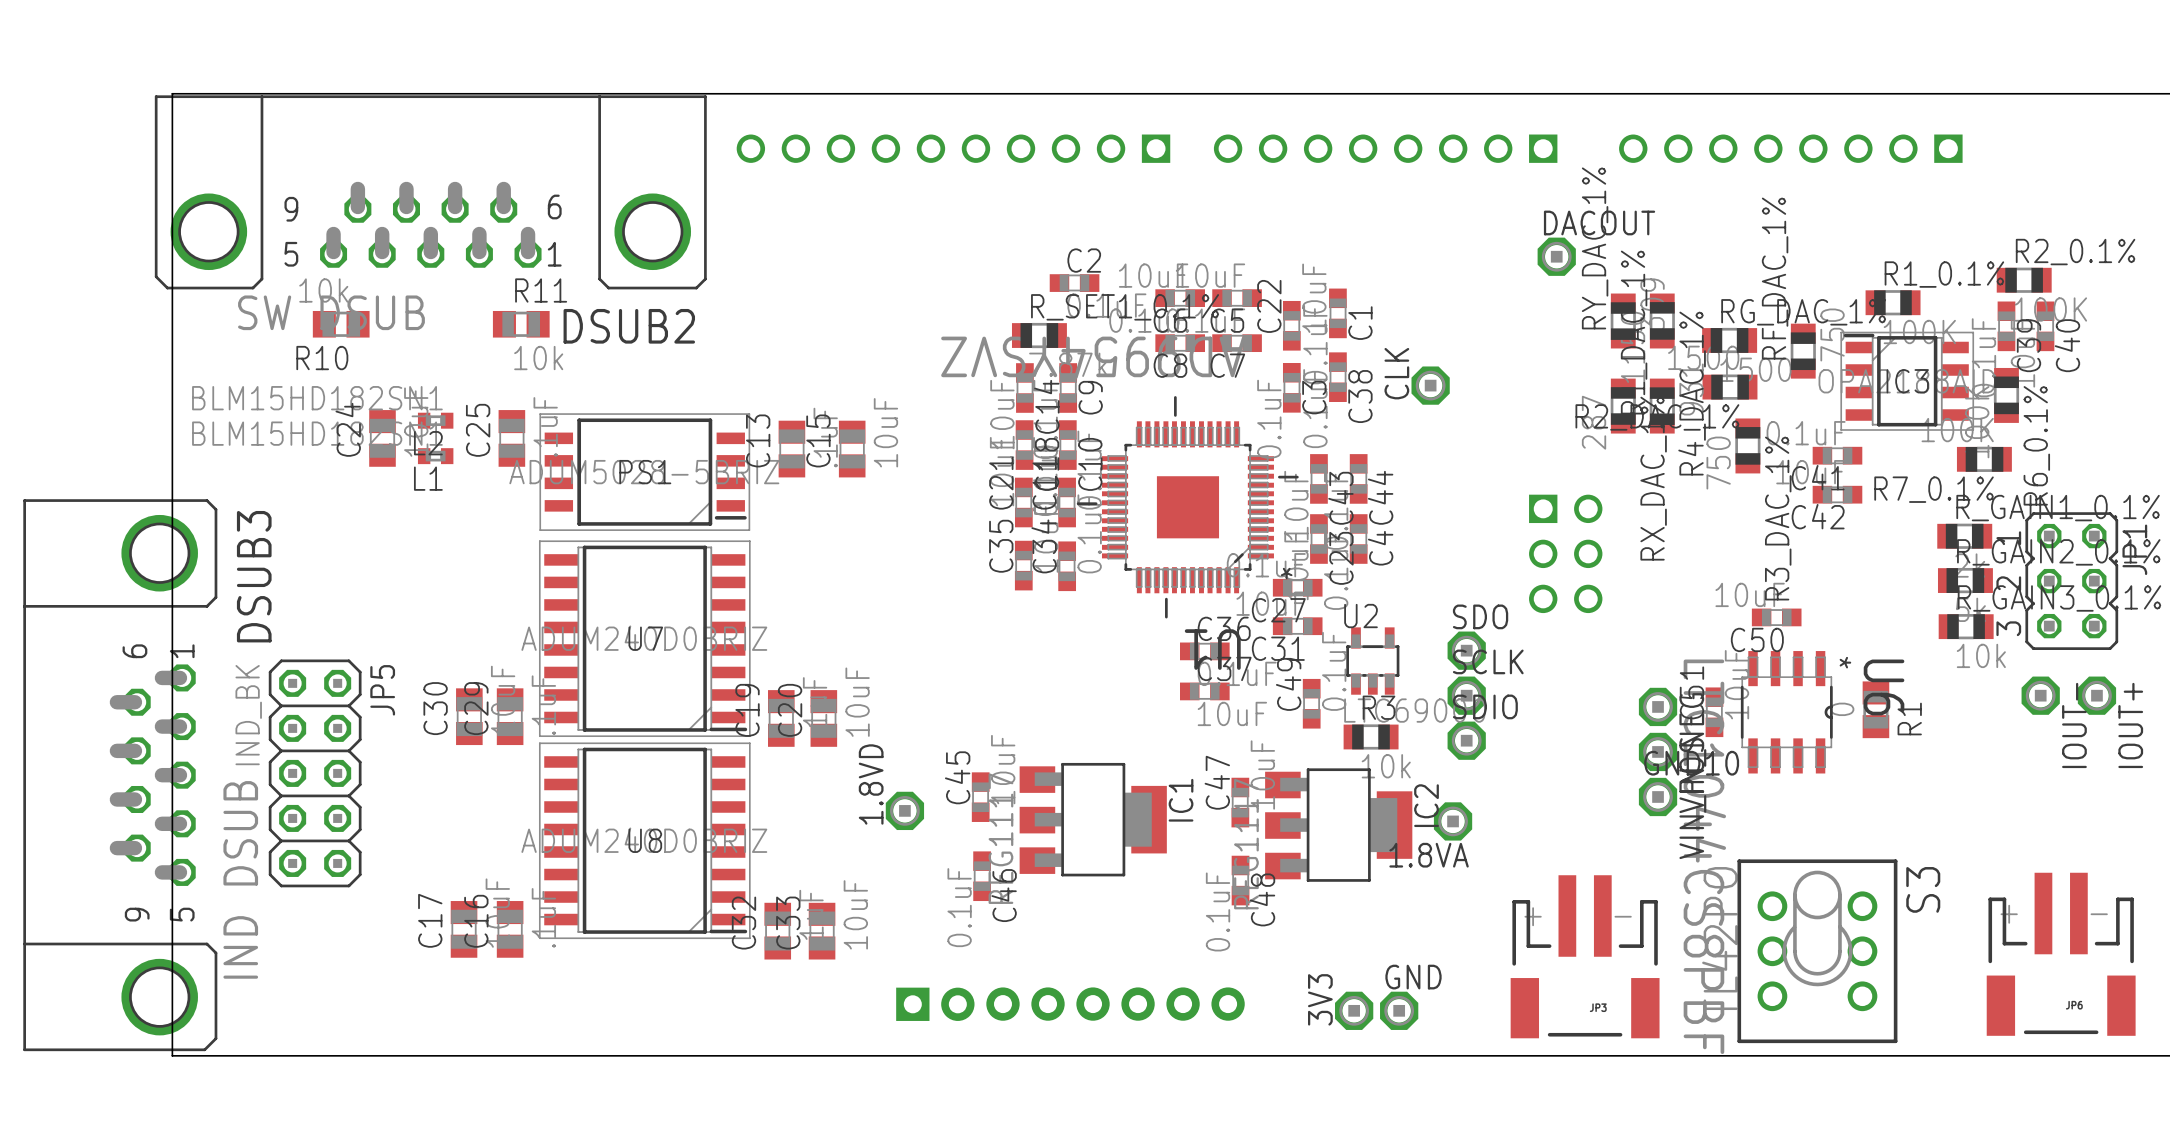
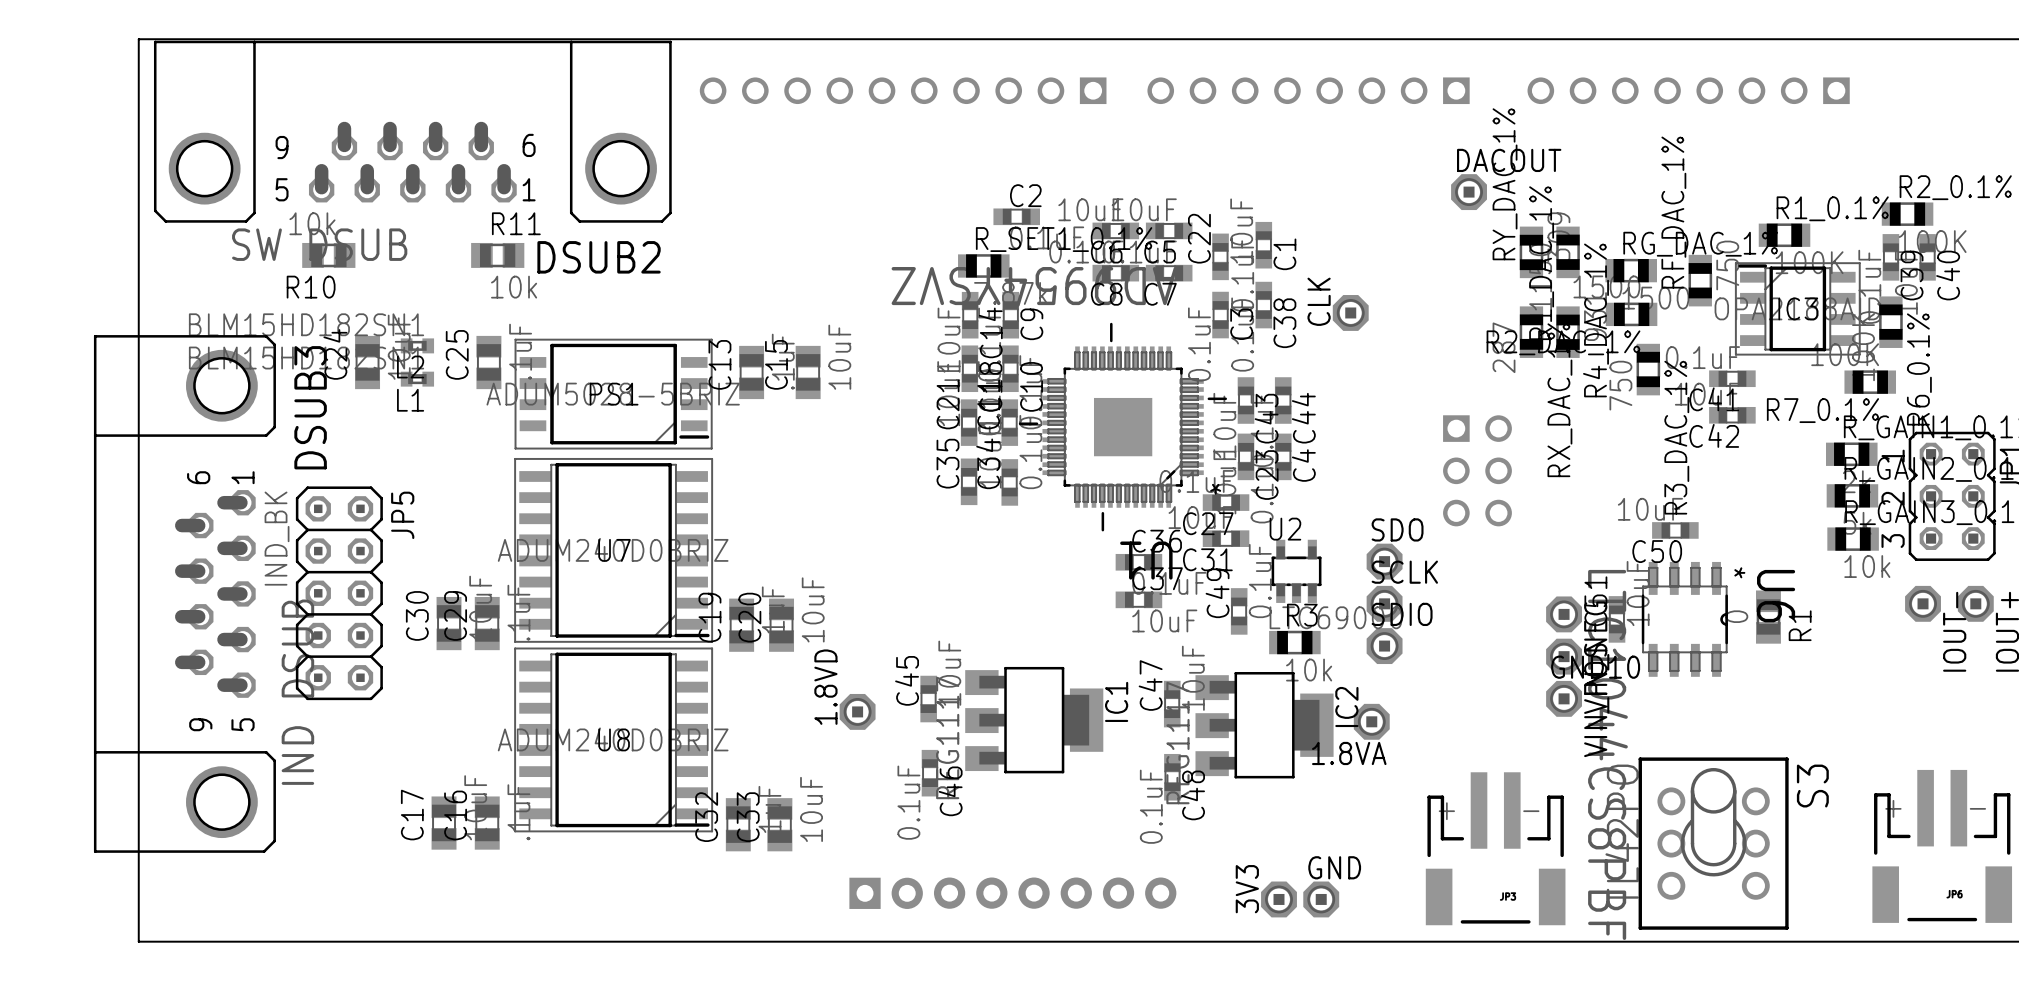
board edge: (172, 93) (172, 1055) -> (170, 39) (138, 39) (138, 941) (170, 941)
JP5 position: (315, 773) -> (339, 593)
DSUB3 position: (120, 775) -> (184, 593)

